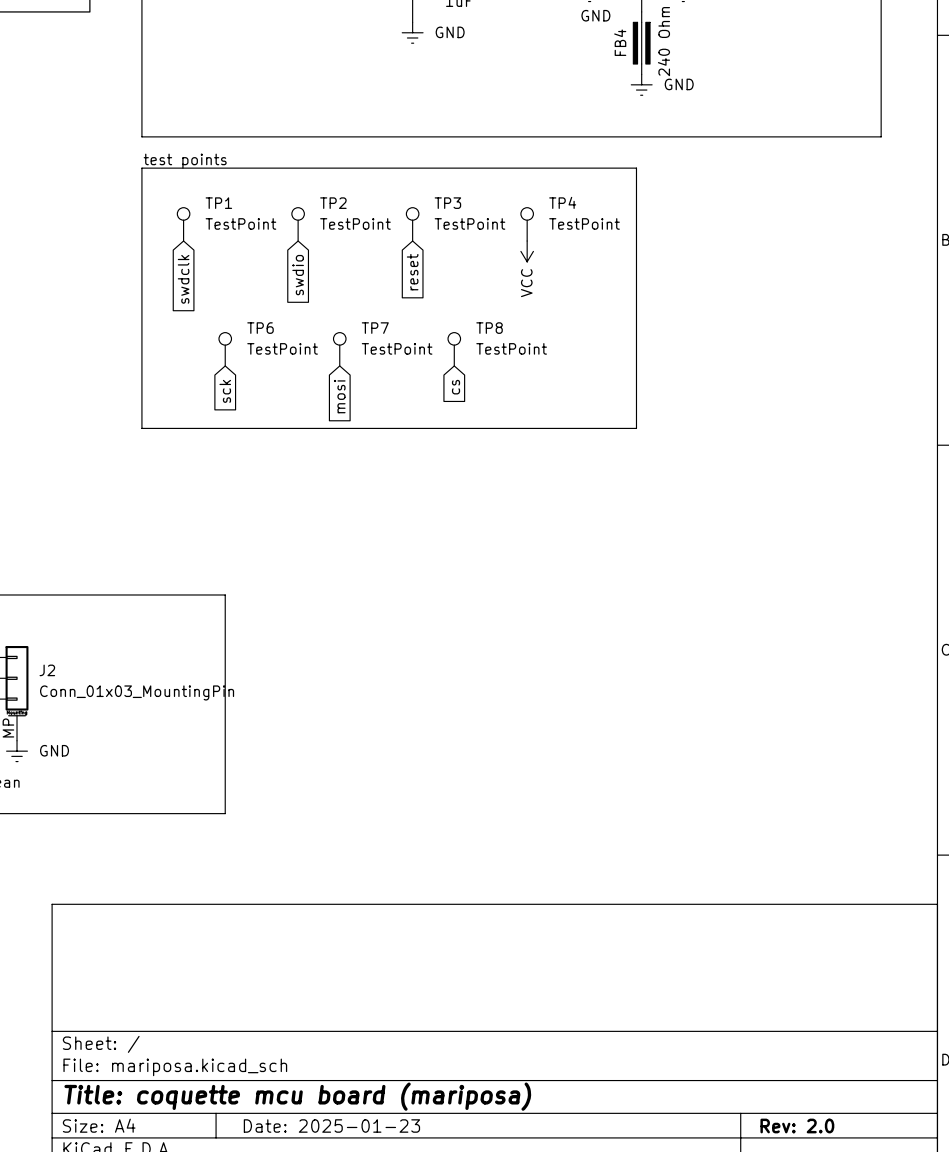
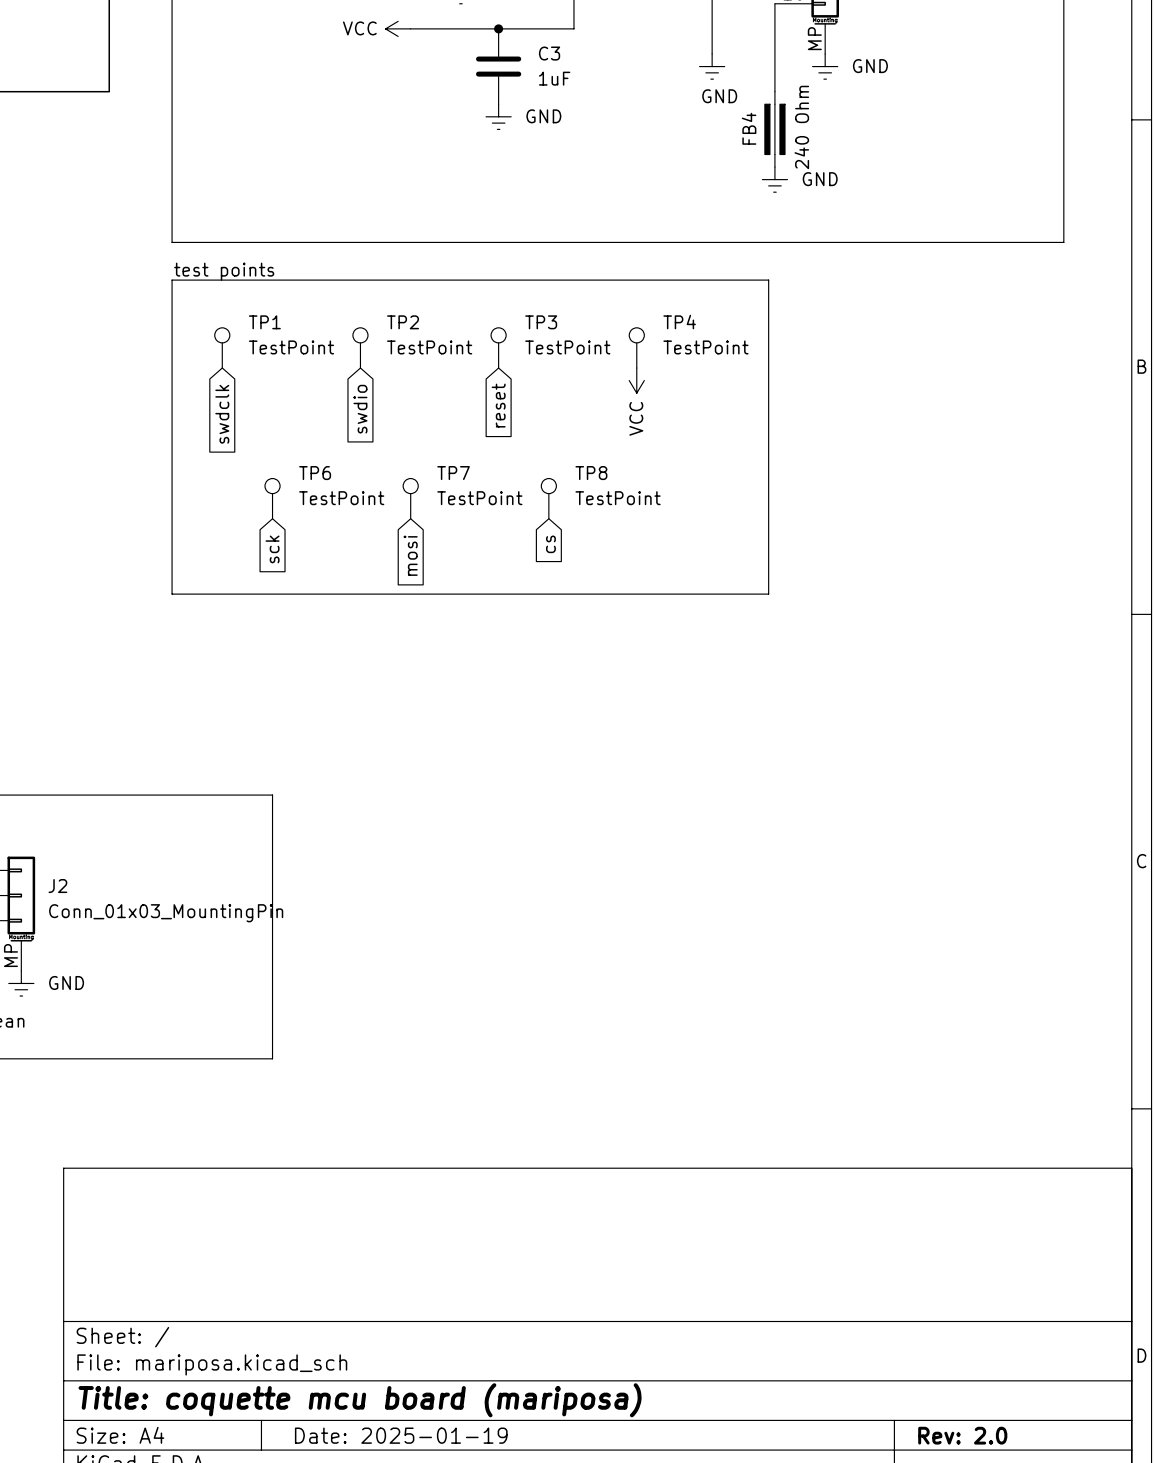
title block: Date: 2025-01-23 (331, 1126) -> Date: 2025-01-19 (401, 1435)

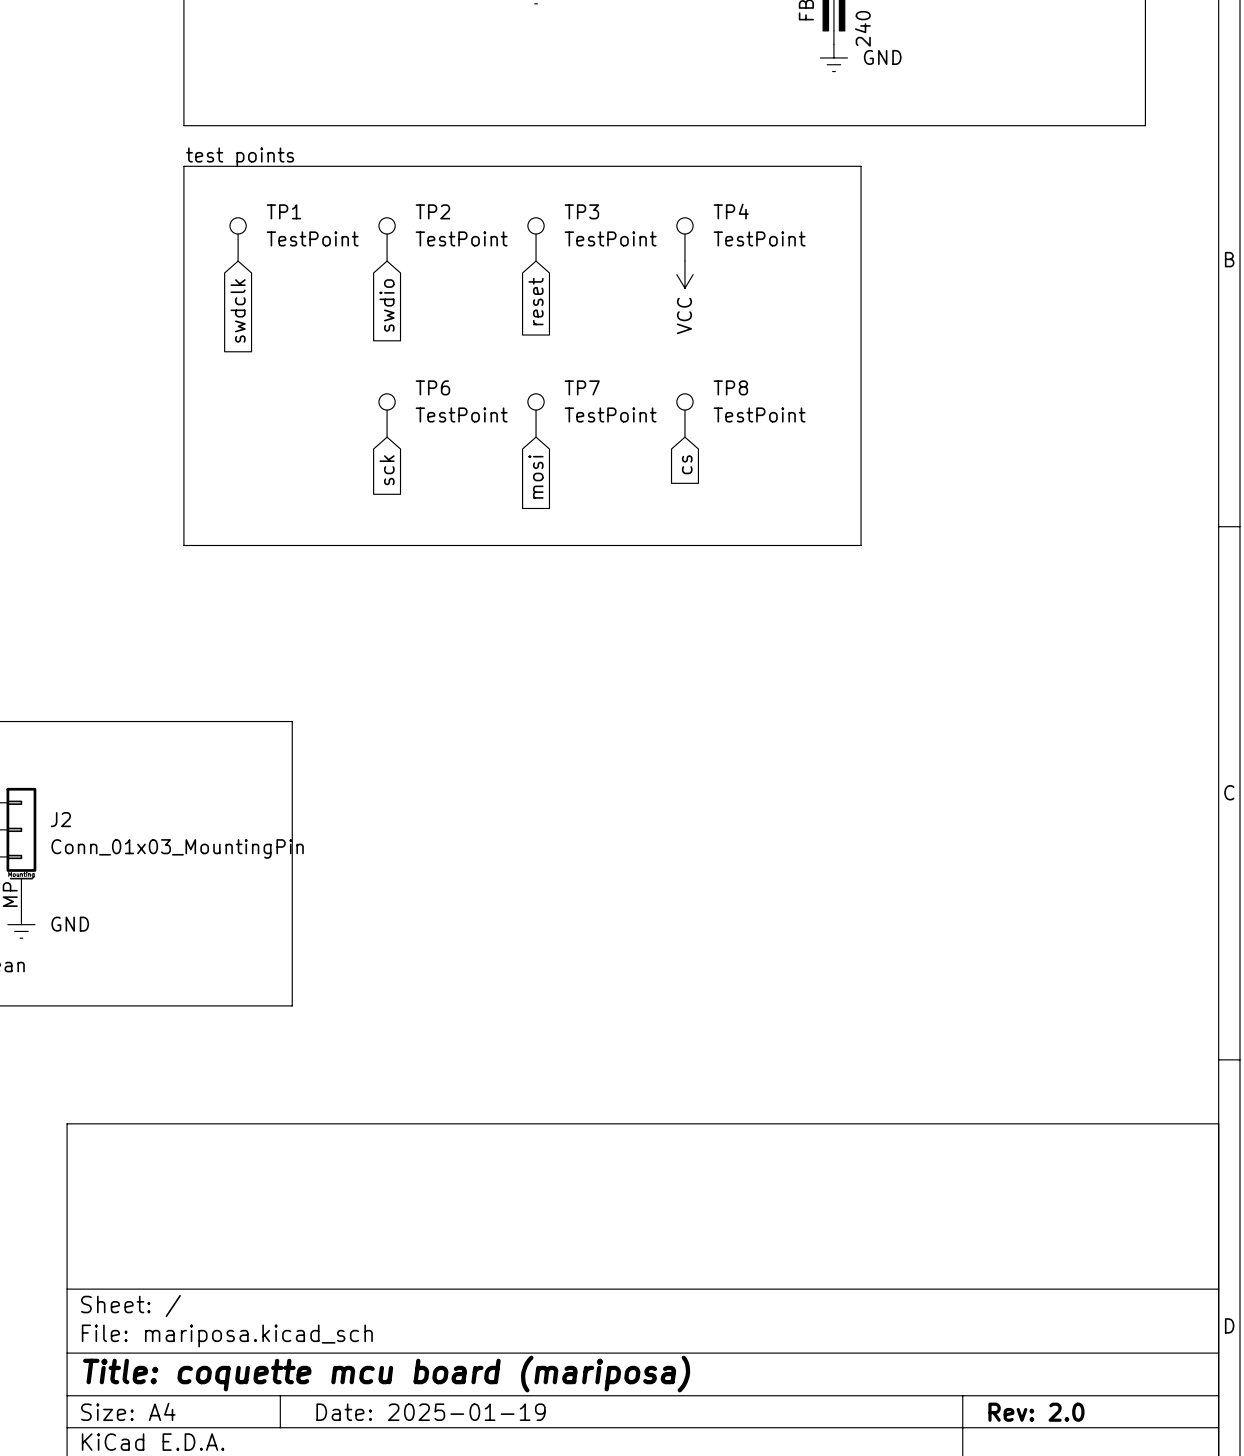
line: (768, 280) (768, 594) (172, 594) -> (827, 166) (861, 166) (861, 545) (183, 545) (183, 504)
TP6 position: (272, 498) -> (387, 415)
TP7 position: (410, 498) -> (536, 415)
TP8 position: (548, 498) -> (684, 415)
global label position: cs (550, 544) -> cs (687, 464)
global label position: sck (272, 549) -> sck (387, 470)
global label position: mosi (410, 555) -> mosi (536, 476)

